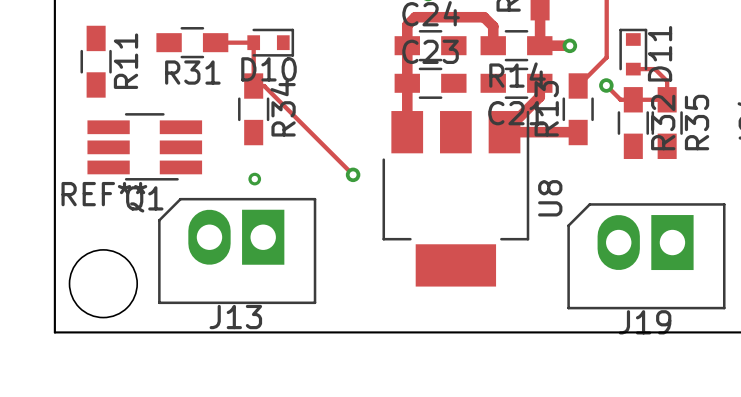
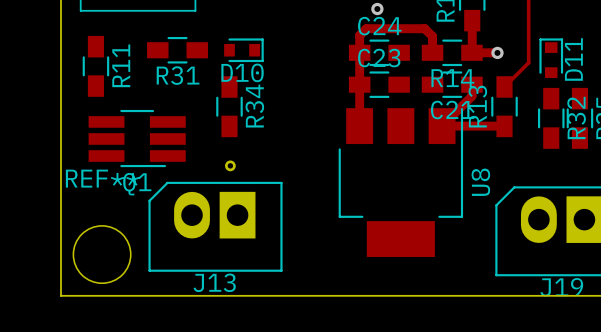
track: (215, 42) (253, 42) (253, 86) (264, 86) (353, 174) -> none
track: (633, 69) (655, 69) (667, 81) (667, 99) (620, 99) (606, 85) -> none
via: (606, 85) -> none
via: (353, 174) -> none

